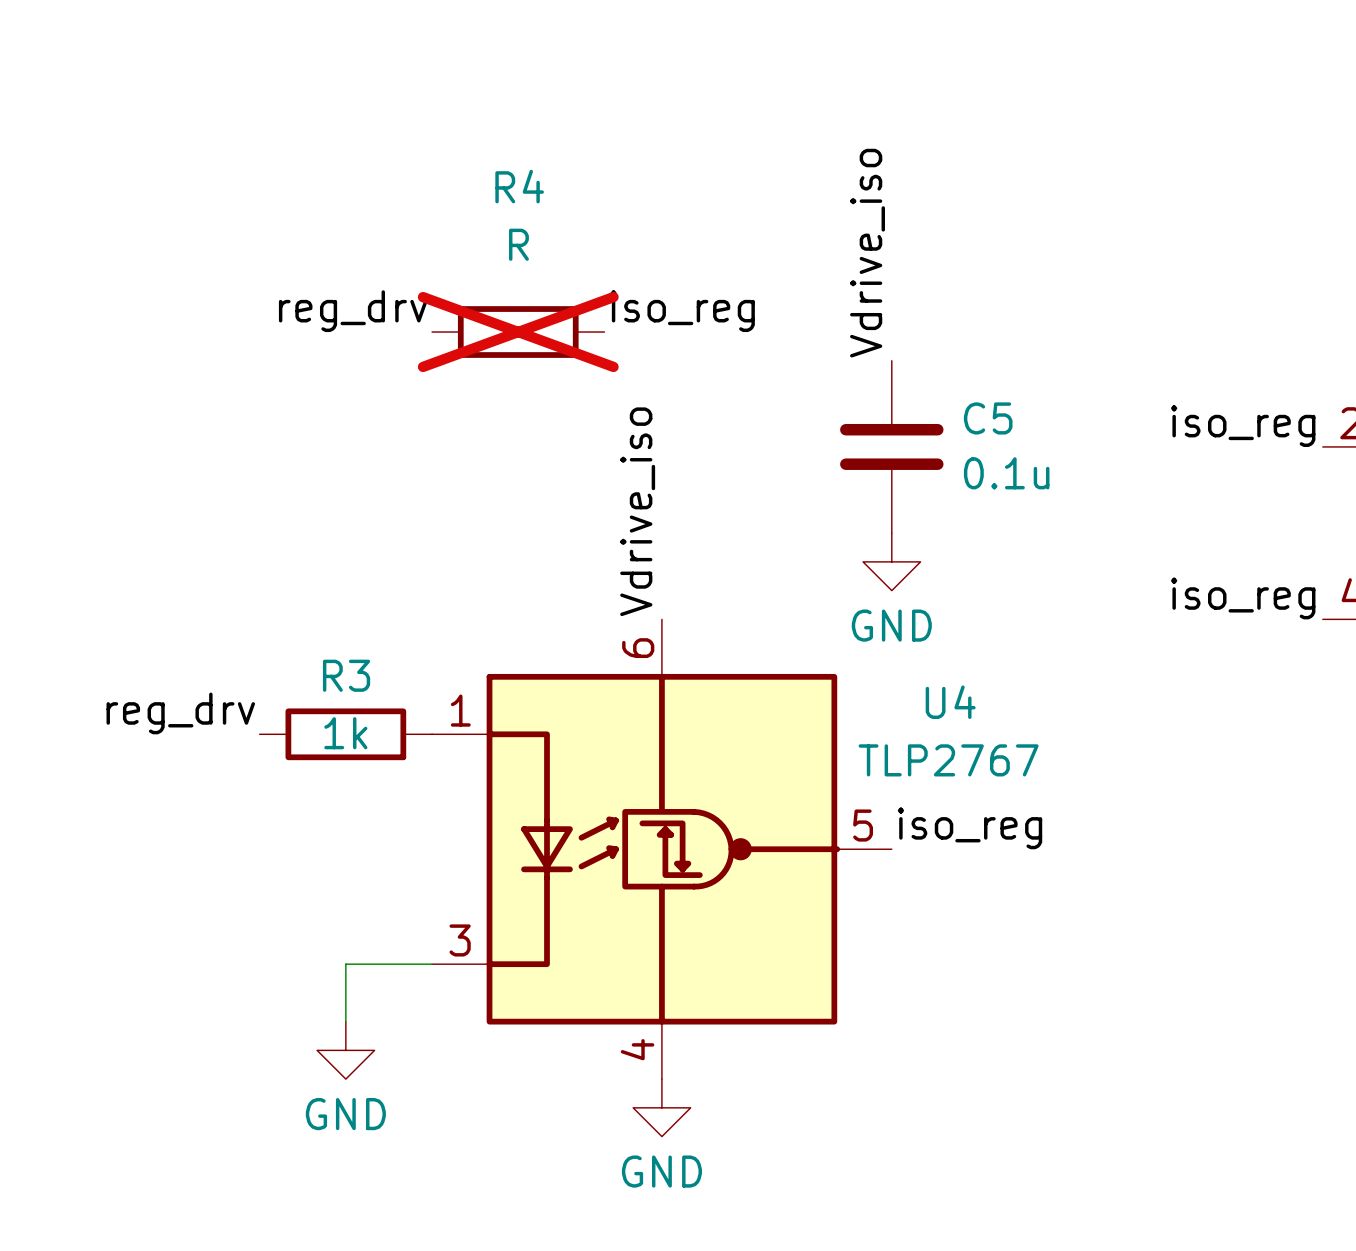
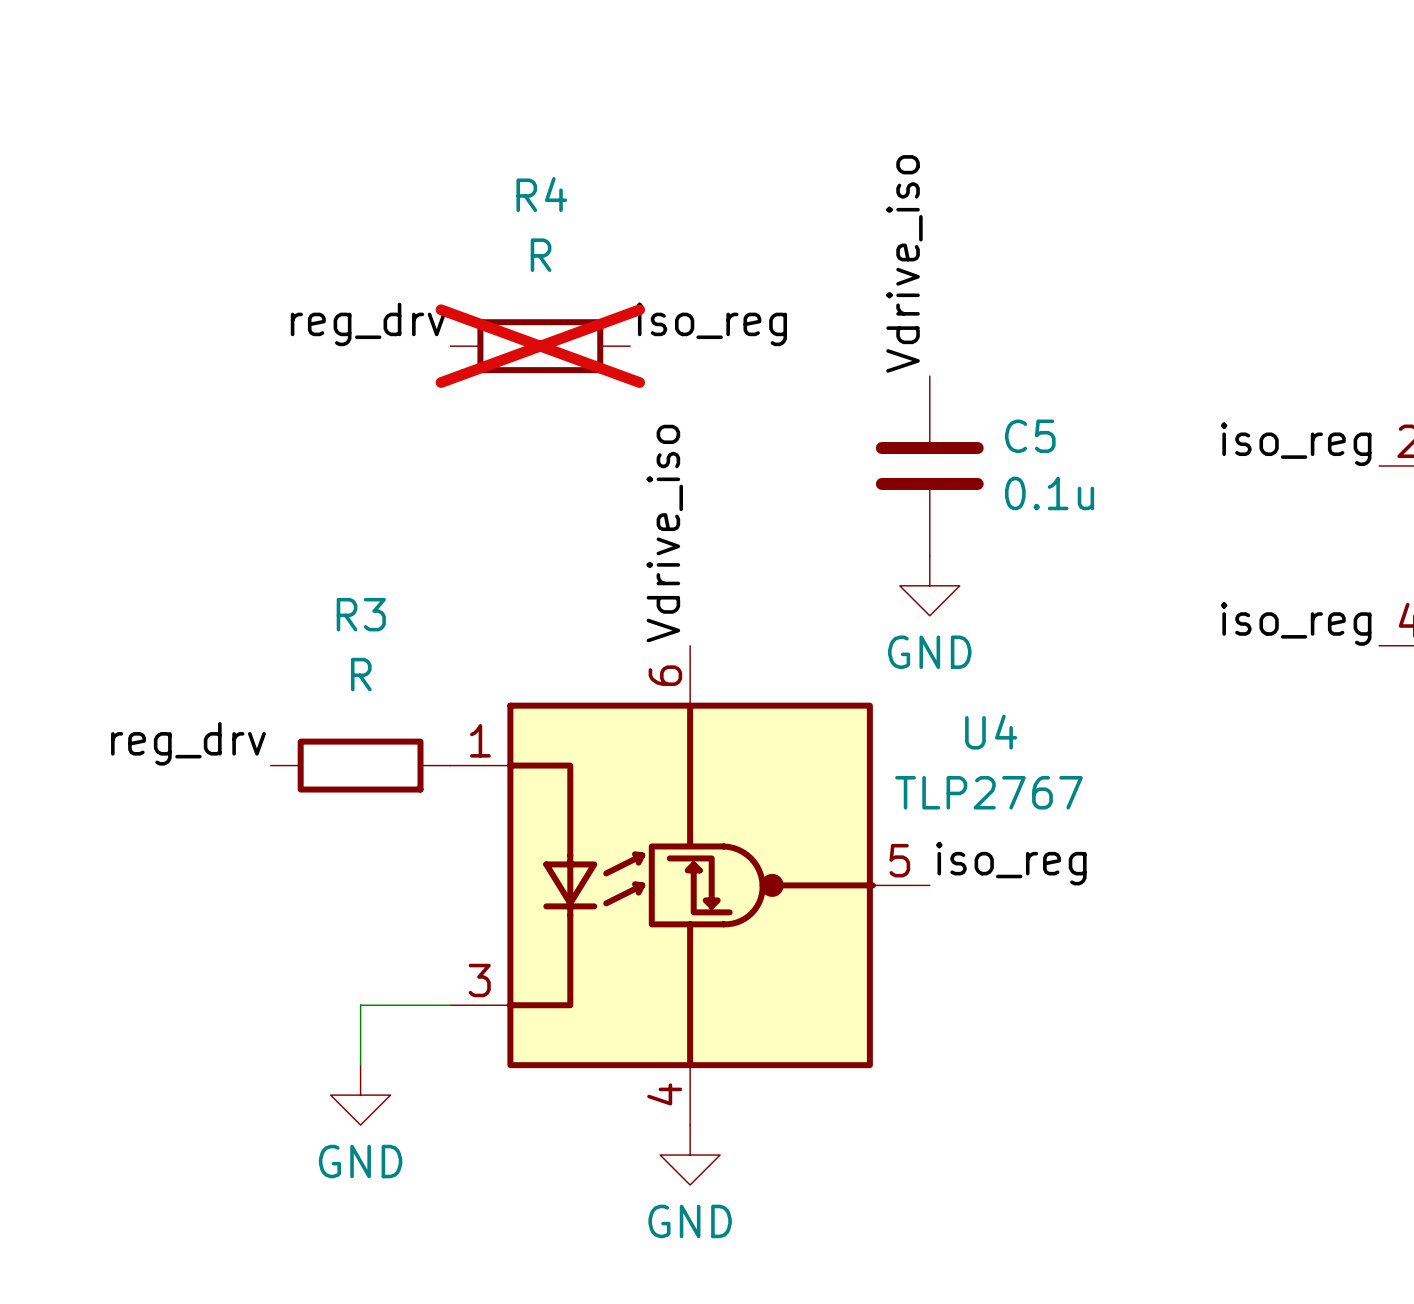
R3 name position: R3 (346, 675) -> R3 (361, 614)
R3 value: 1k (345, 733) -> R (361, 674)

